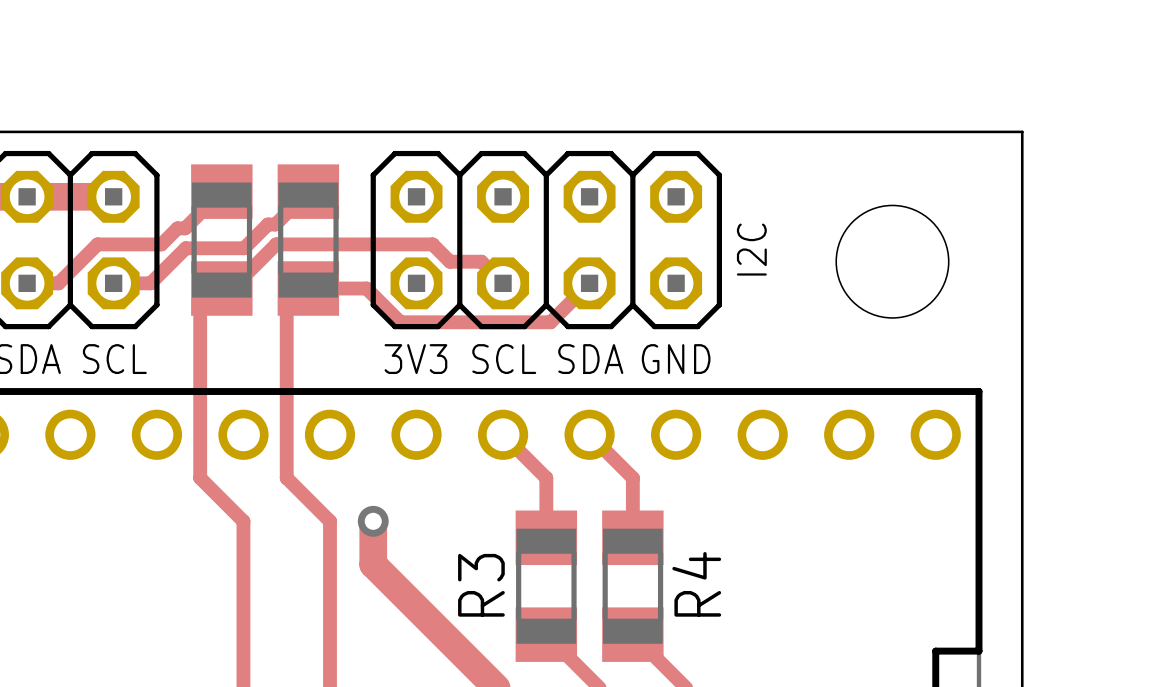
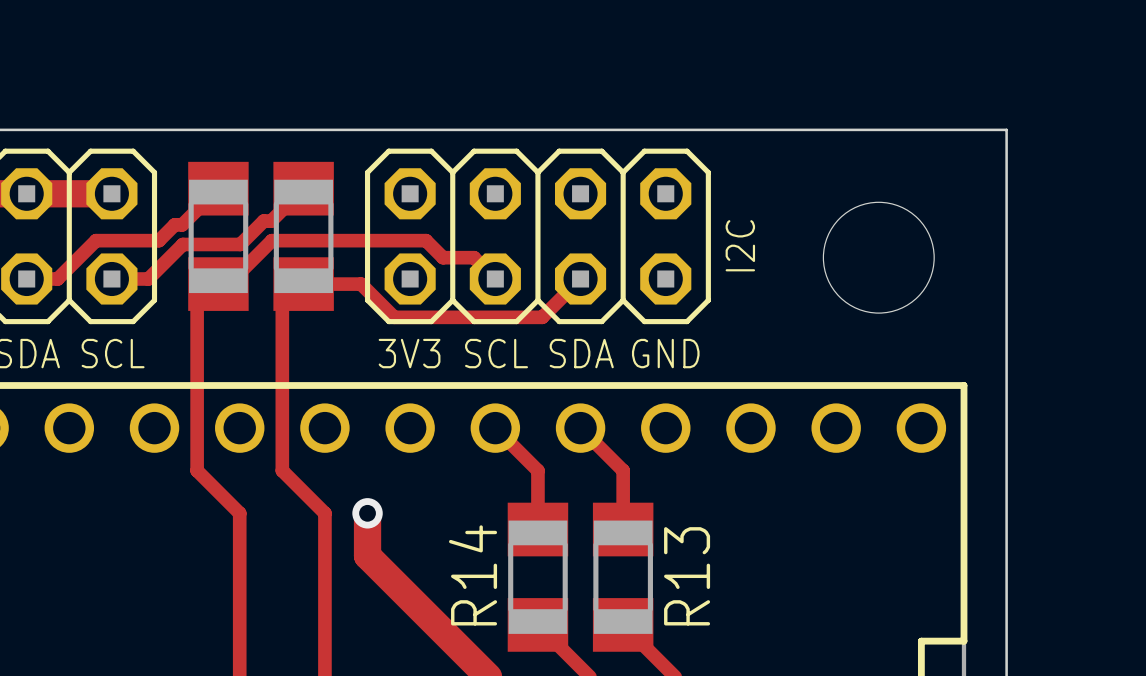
R4 name: R4 (696, 584) -> R13 (687, 576)
R3 name: R3 (481, 585) -> R14 (473, 575)

